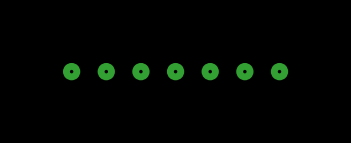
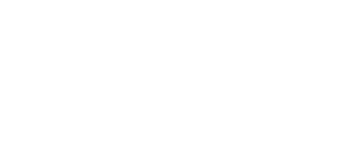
part: (175, 71) -> none

